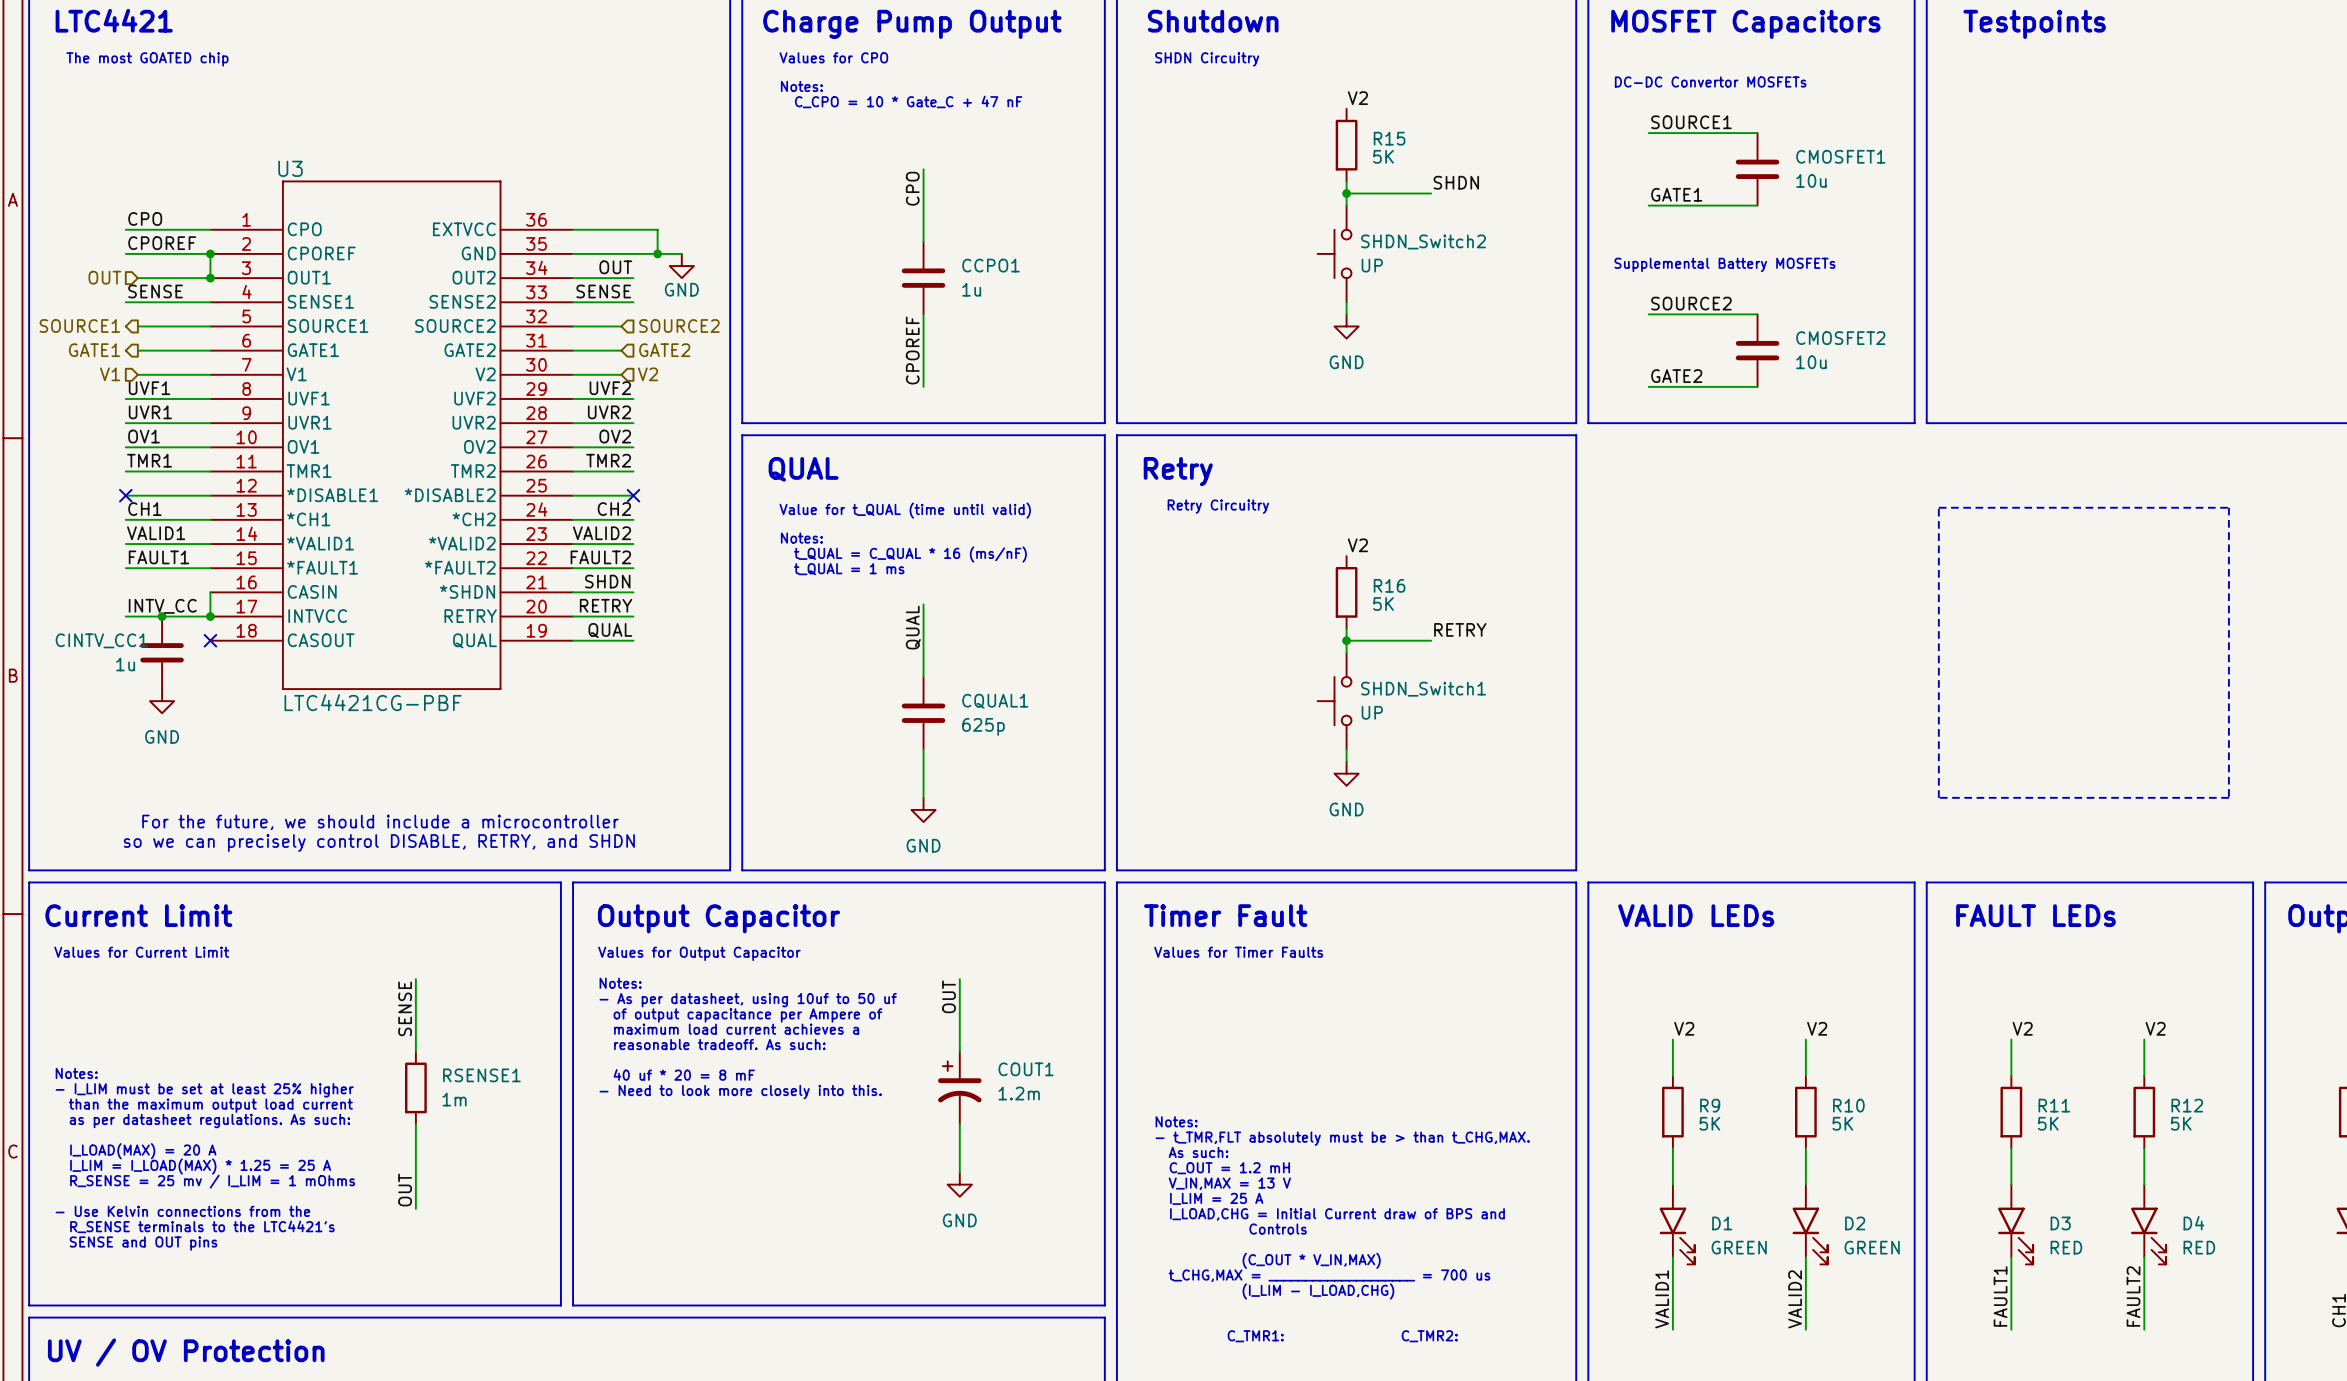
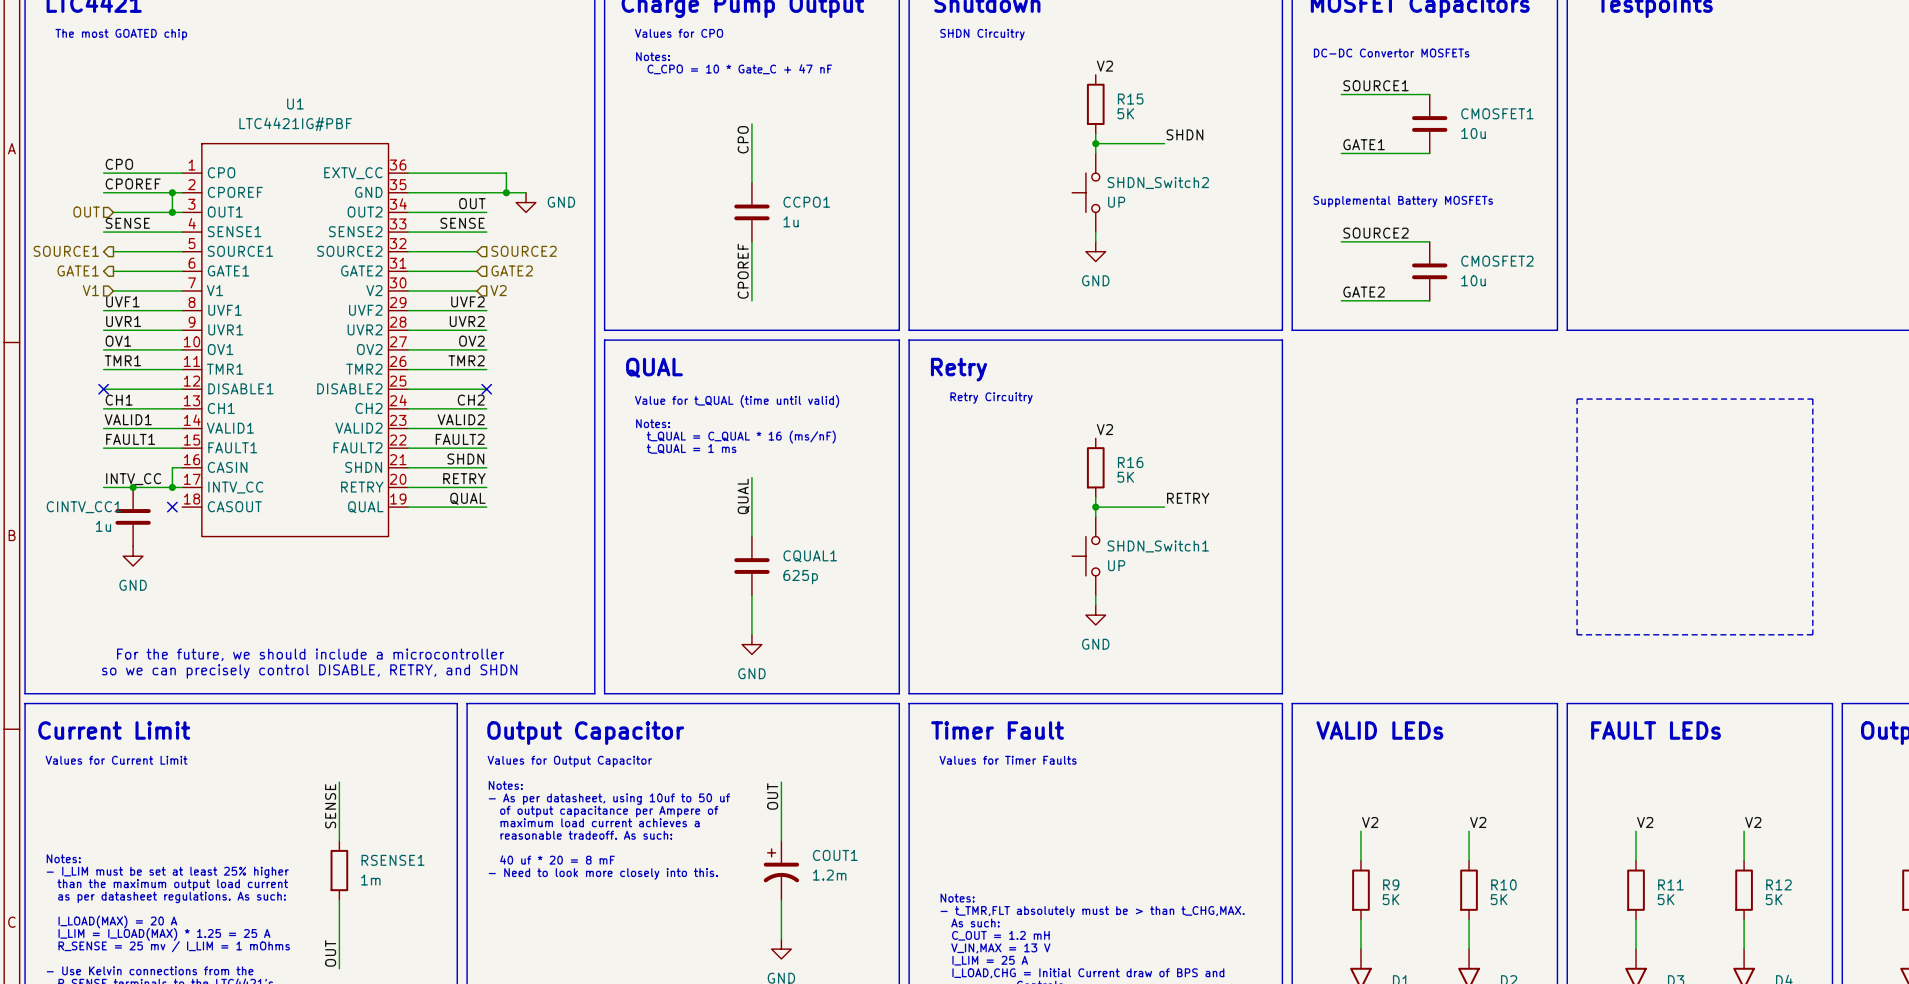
wire: (621, 229) (657, 229) (657, 253) -> (506, 173) (506, 192)
wire: (645, 253) (681, 253) -> none
junction position: (657, 253) -> (506, 192)
power symbol position: GND (681, 266) -> GND (526, 202)
label position: OUT (615, 267) -> OUT (472, 203)
wire: (597, 278) (633, 278) -> none
power symbol text position: GND (681, 289) -> GND (561, 202)
label position: SENSE (603, 291) -> SENSE (462, 223)
wire: (597, 302) (633, 302) -> none
wire: (585, 326) (621, 326) -> none
hierarchical label position: SOURCE2 (679, 326) -> SOURCE2 (524, 251)
wire: (585, 350) (621, 350) -> none
hierarchical label position: GATE2 (664, 350) -> GATE2 (512, 270)
wire: (585, 374) (621, 374) -> none
hierarchical label position: V2 (648, 374) -> V2 (498, 290)
label position: UVF2 (610, 388) -> UVF2 (467, 301)
wire: (597, 398) (633, 398) -> none
label position: UVR2 (609, 412) -> UVR2 (467, 321)
wire: (597, 423) (633, 423) -> none
U1: none -> (295, 340)
U3: LTC4421CG-PBF (391, 435) -> none
label position: OV2 (615, 436) -> OV2 (471, 341)
wire: (597, 447) (633, 447) -> none
label position: TMR2 (608, 460) -> TMR2 (466, 360)
wire: (597, 471) (633, 471) -> none
wire: (597, 495) (633, 495) -> none
no-connect mark position: (633, 495) -> (486, 389)
label position: CH2 (614, 509) -> CH2 (471, 400)
wire: (597, 519) (633, 519) -> none
label position: VALID2 (602, 533) -> VALID2 (461, 419)
wire: (597, 544) (633, 544) -> none
label position: FAULT2 (600, 557) -> FAULT2 (460, 439)
wire: (597, 568) (633, 568) -> none
label position: SHDN (607, 581) -> SHDN (465, 459)
wire: (597, 592) (633, 592) -> none
label position: RETRY (606, 605) -> RETRY (464, 478)
wire: (597, 616) (633, 616) -> none
label position: QUAL (610, 630) -> QUAL (467, 498)
wire: (597, 640) (633, 640) -> none

